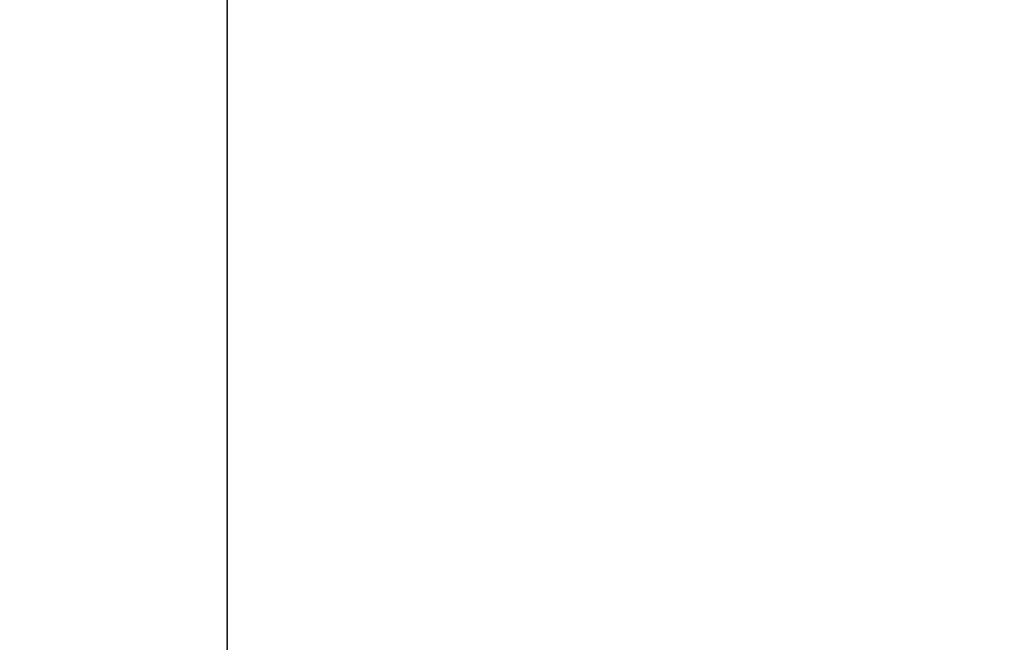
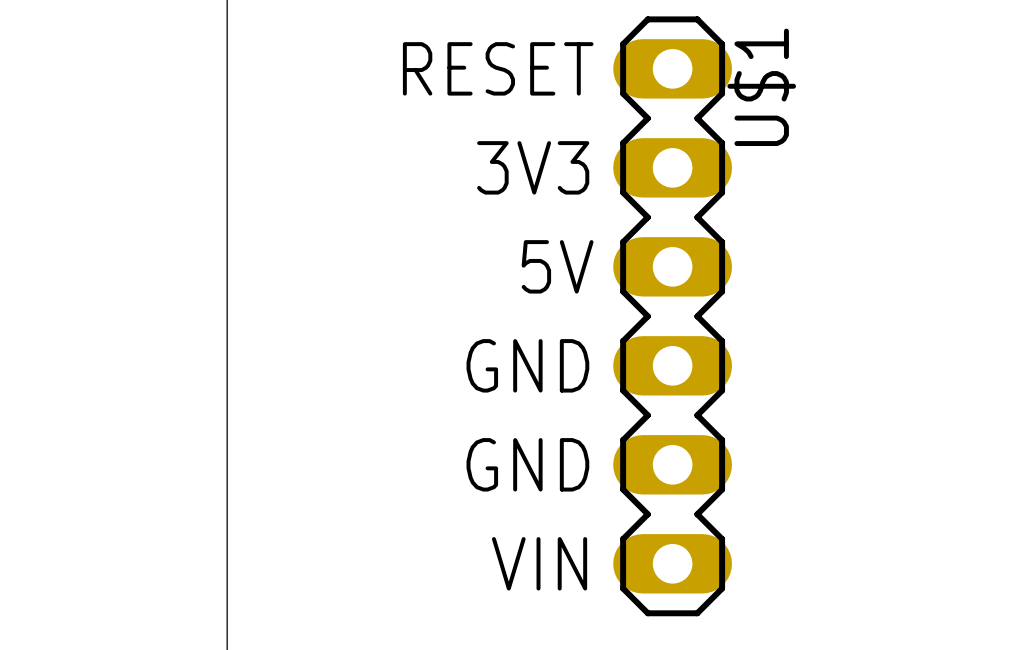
U$1: none -> (672, 316)

